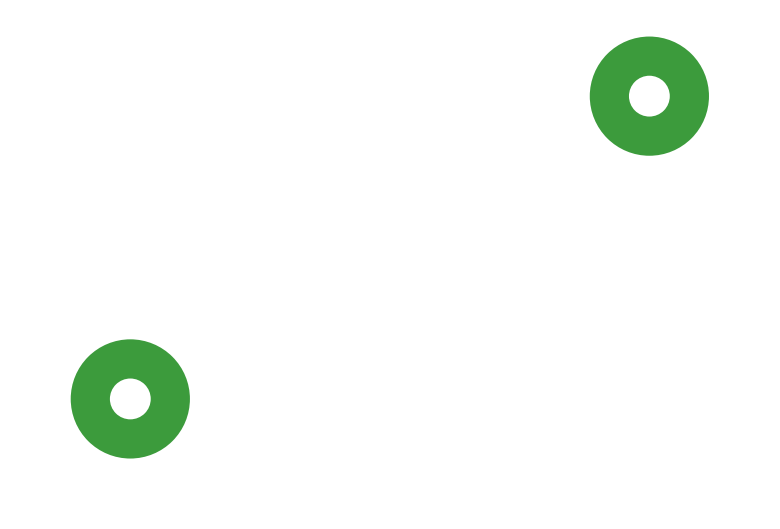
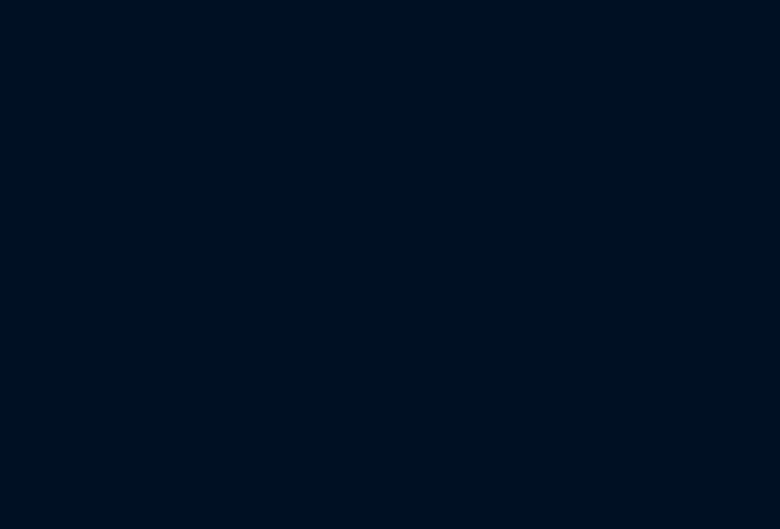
part: (649, 96) -> none
part: (130, 398) -> none

